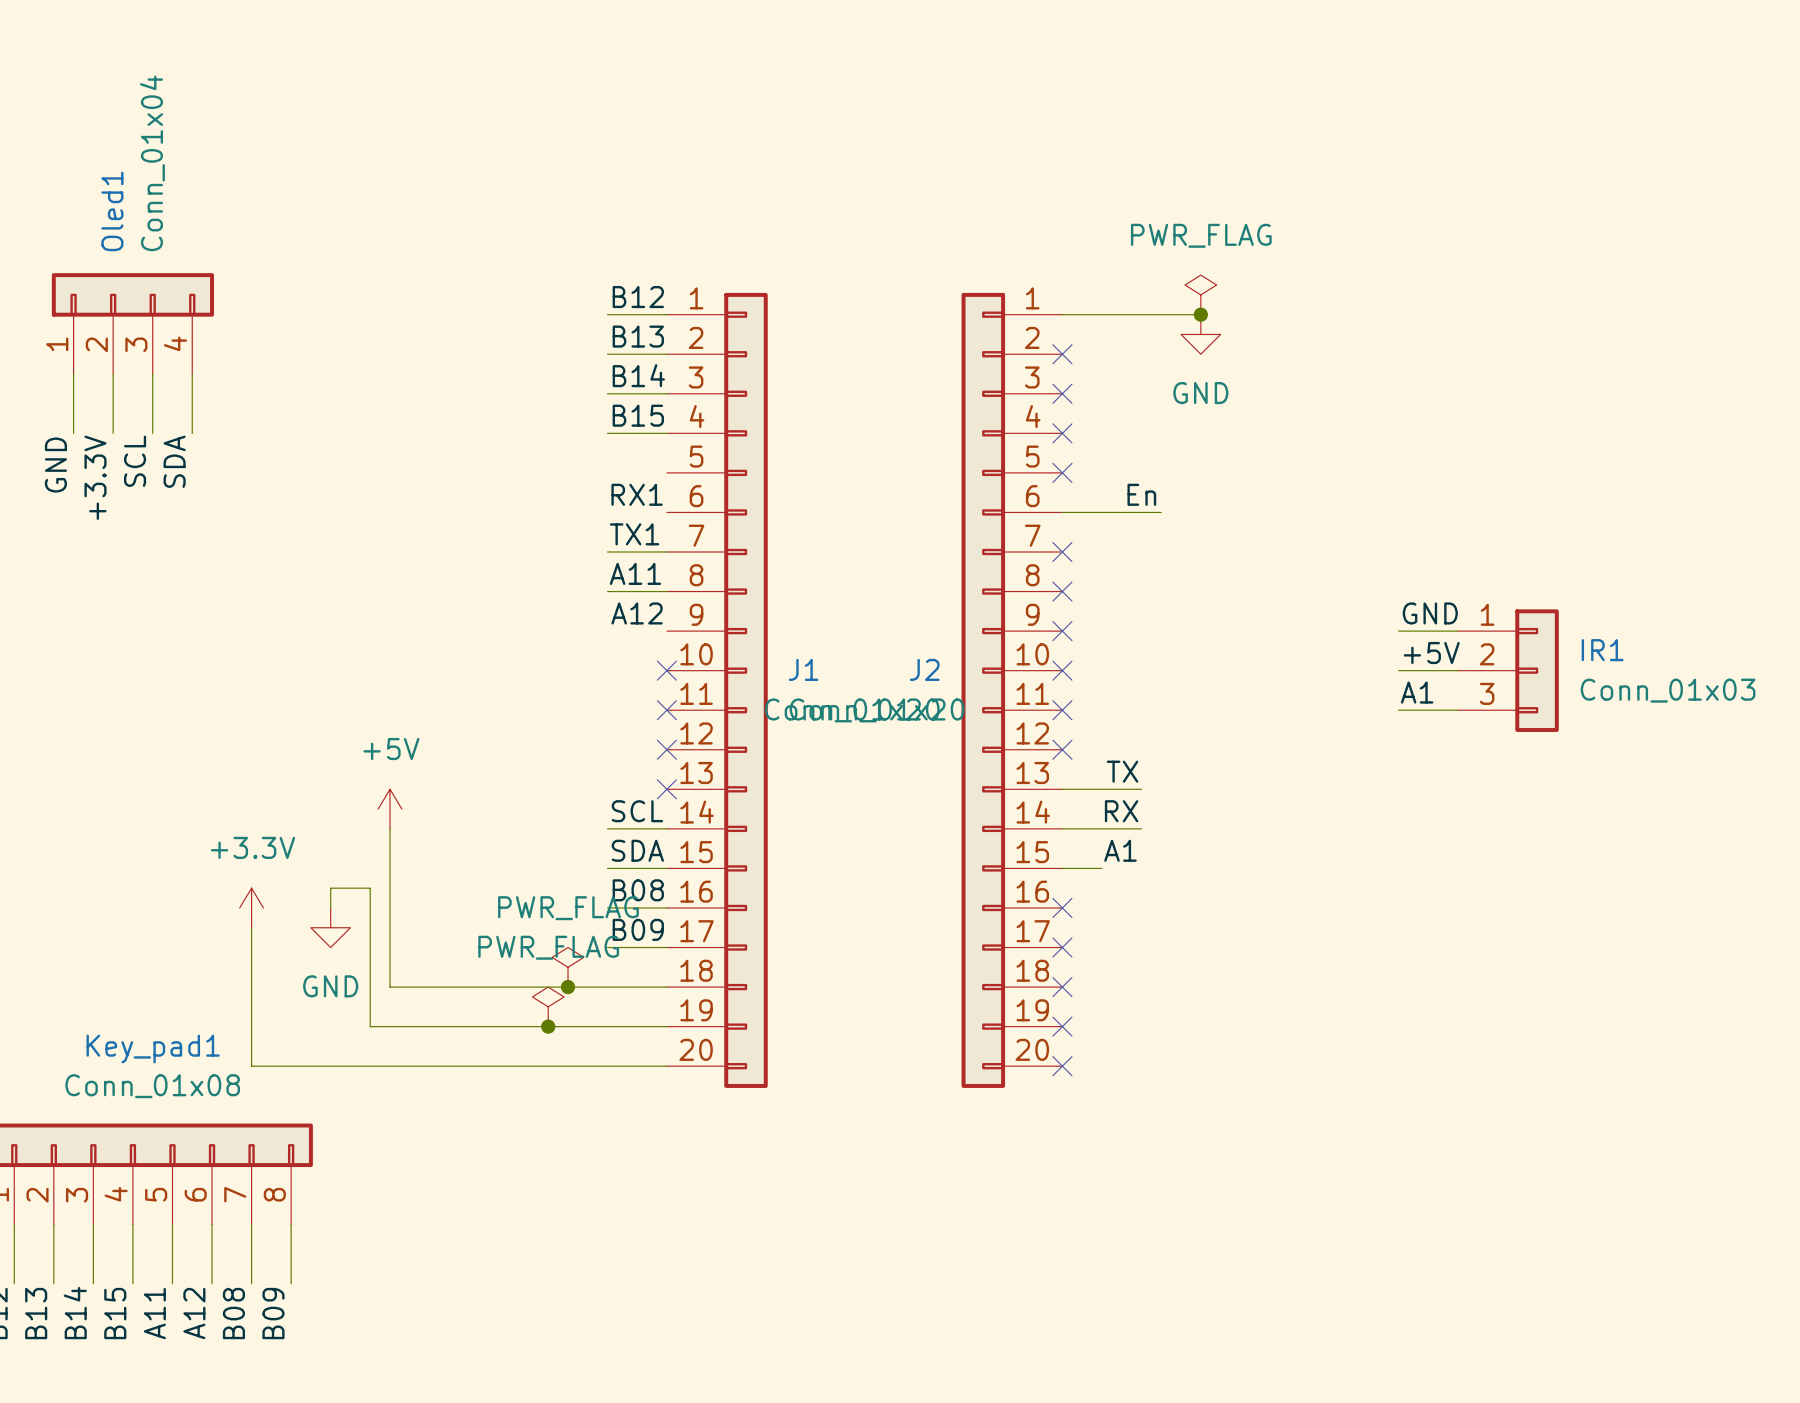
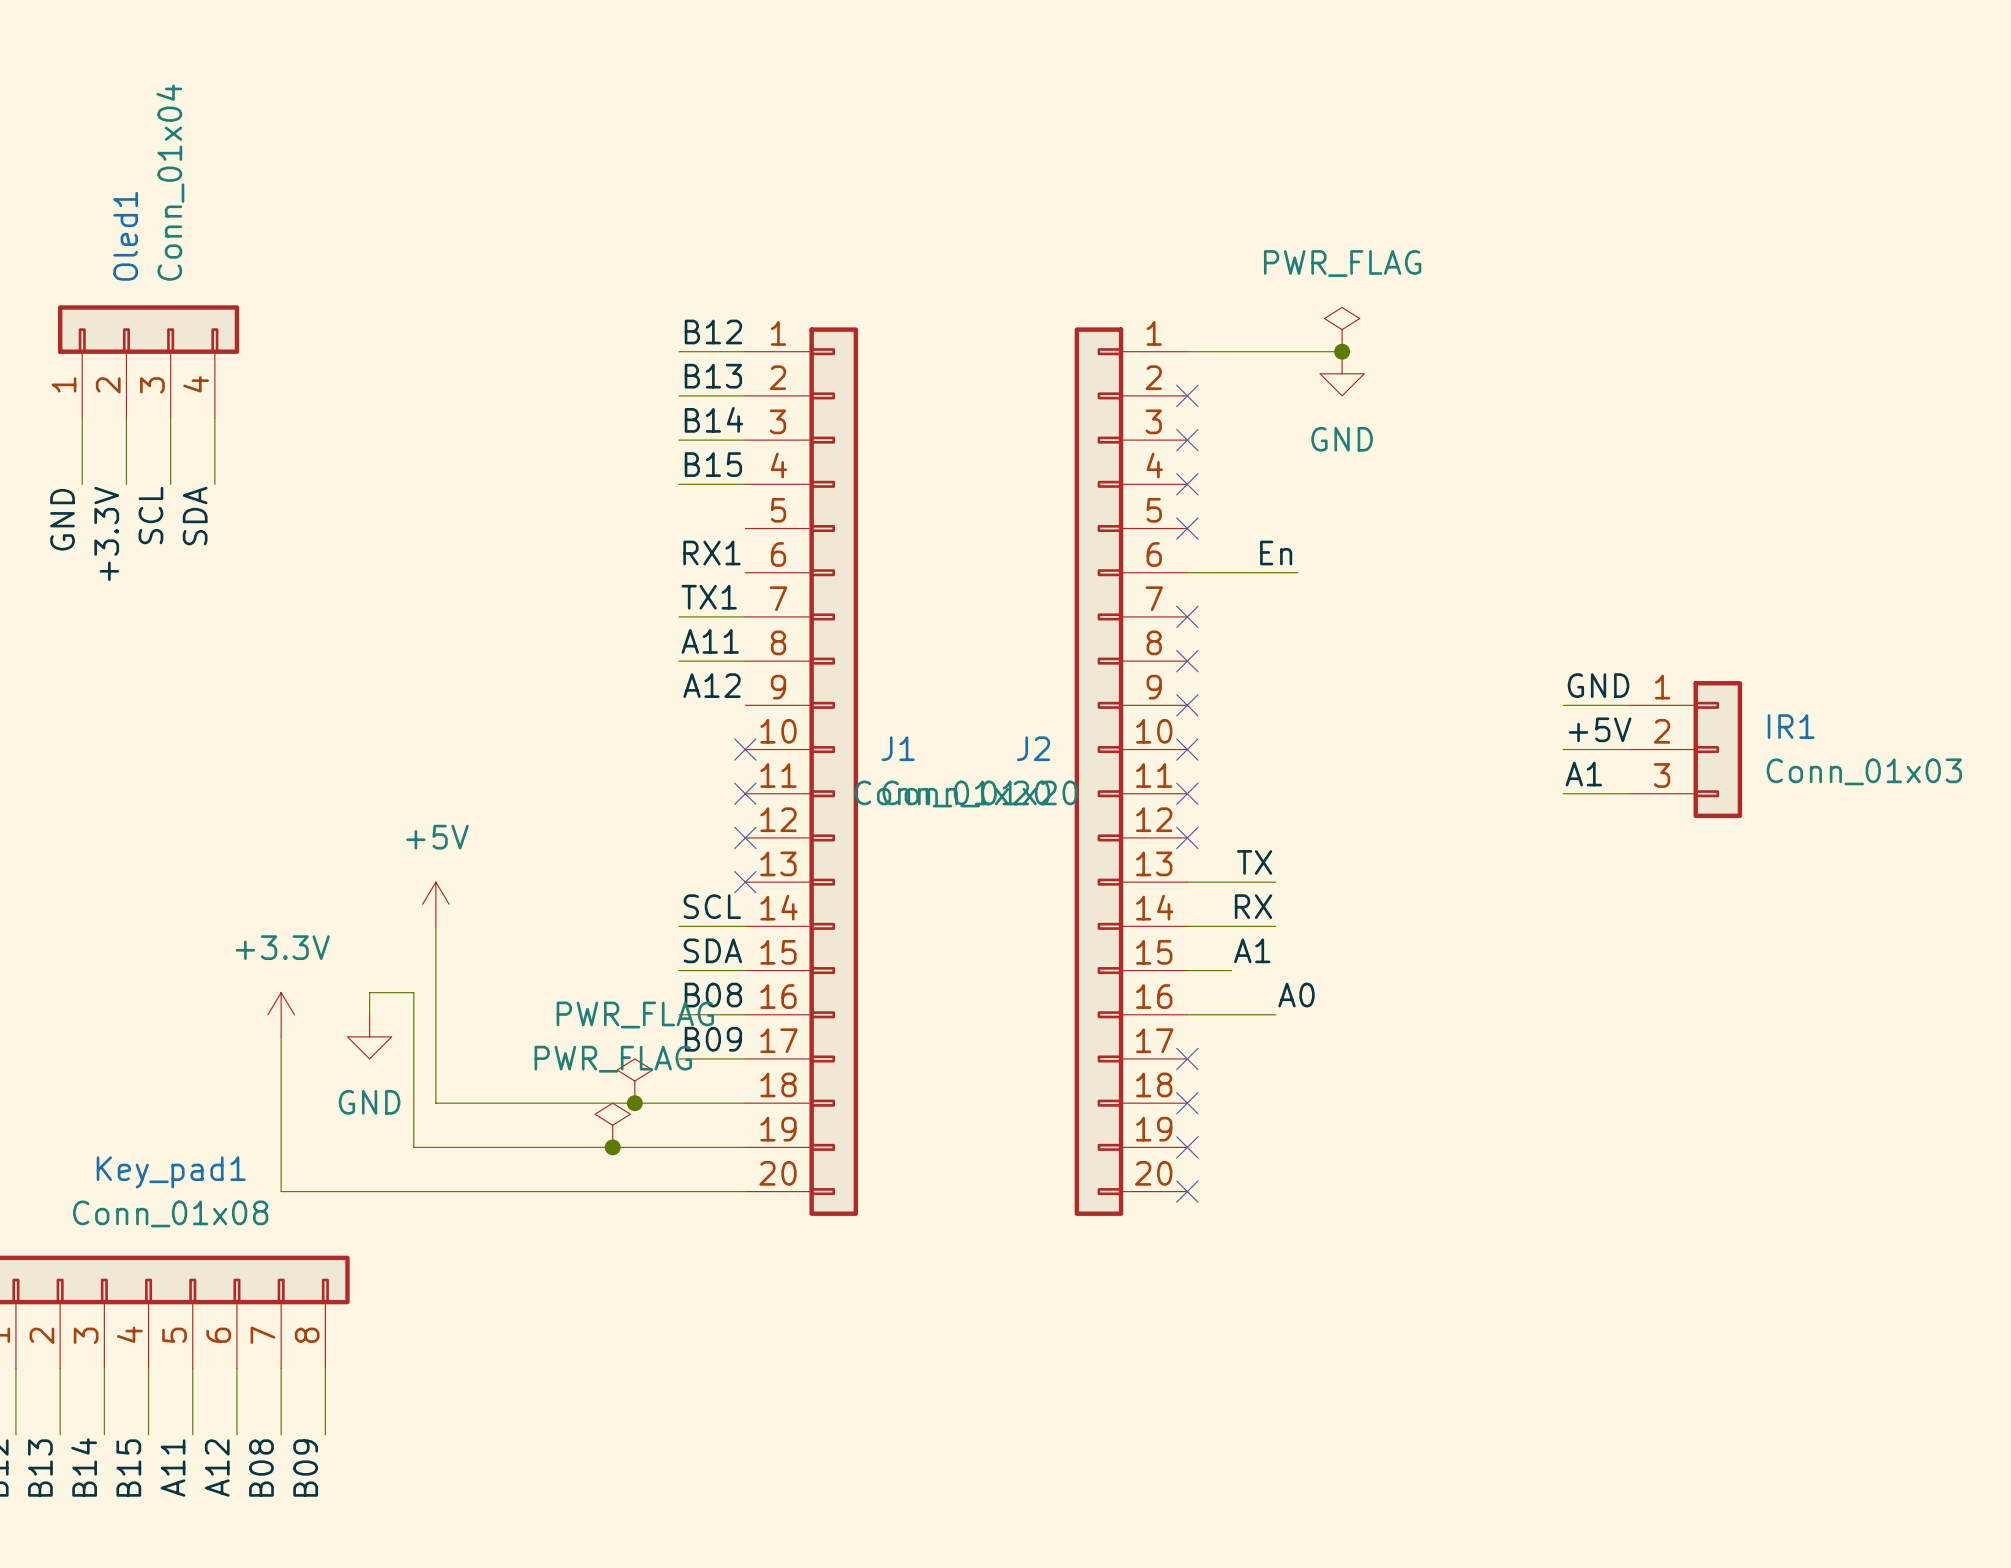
label: none -> A0 (1296, 995)
wire: none -> (1187, 1014) (1275, 1014)
no-connect mark: (1062, 907) -> none

